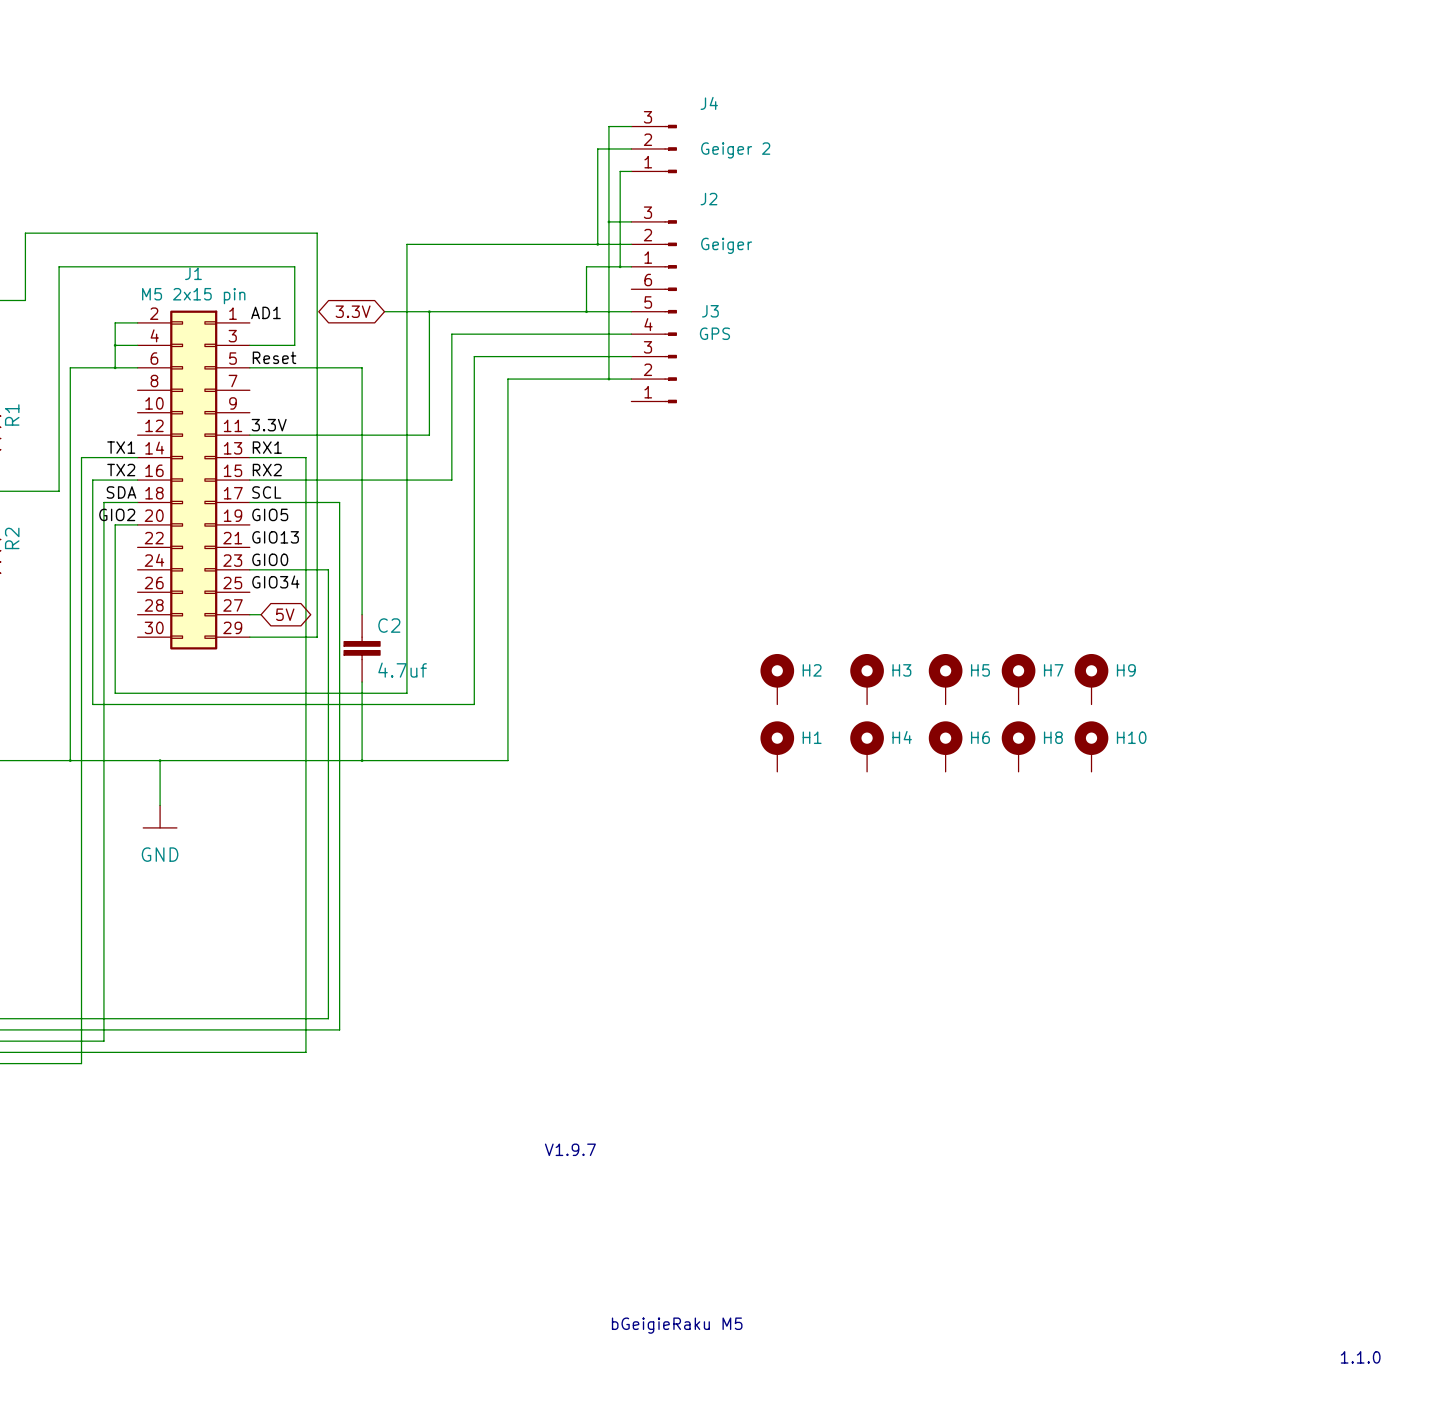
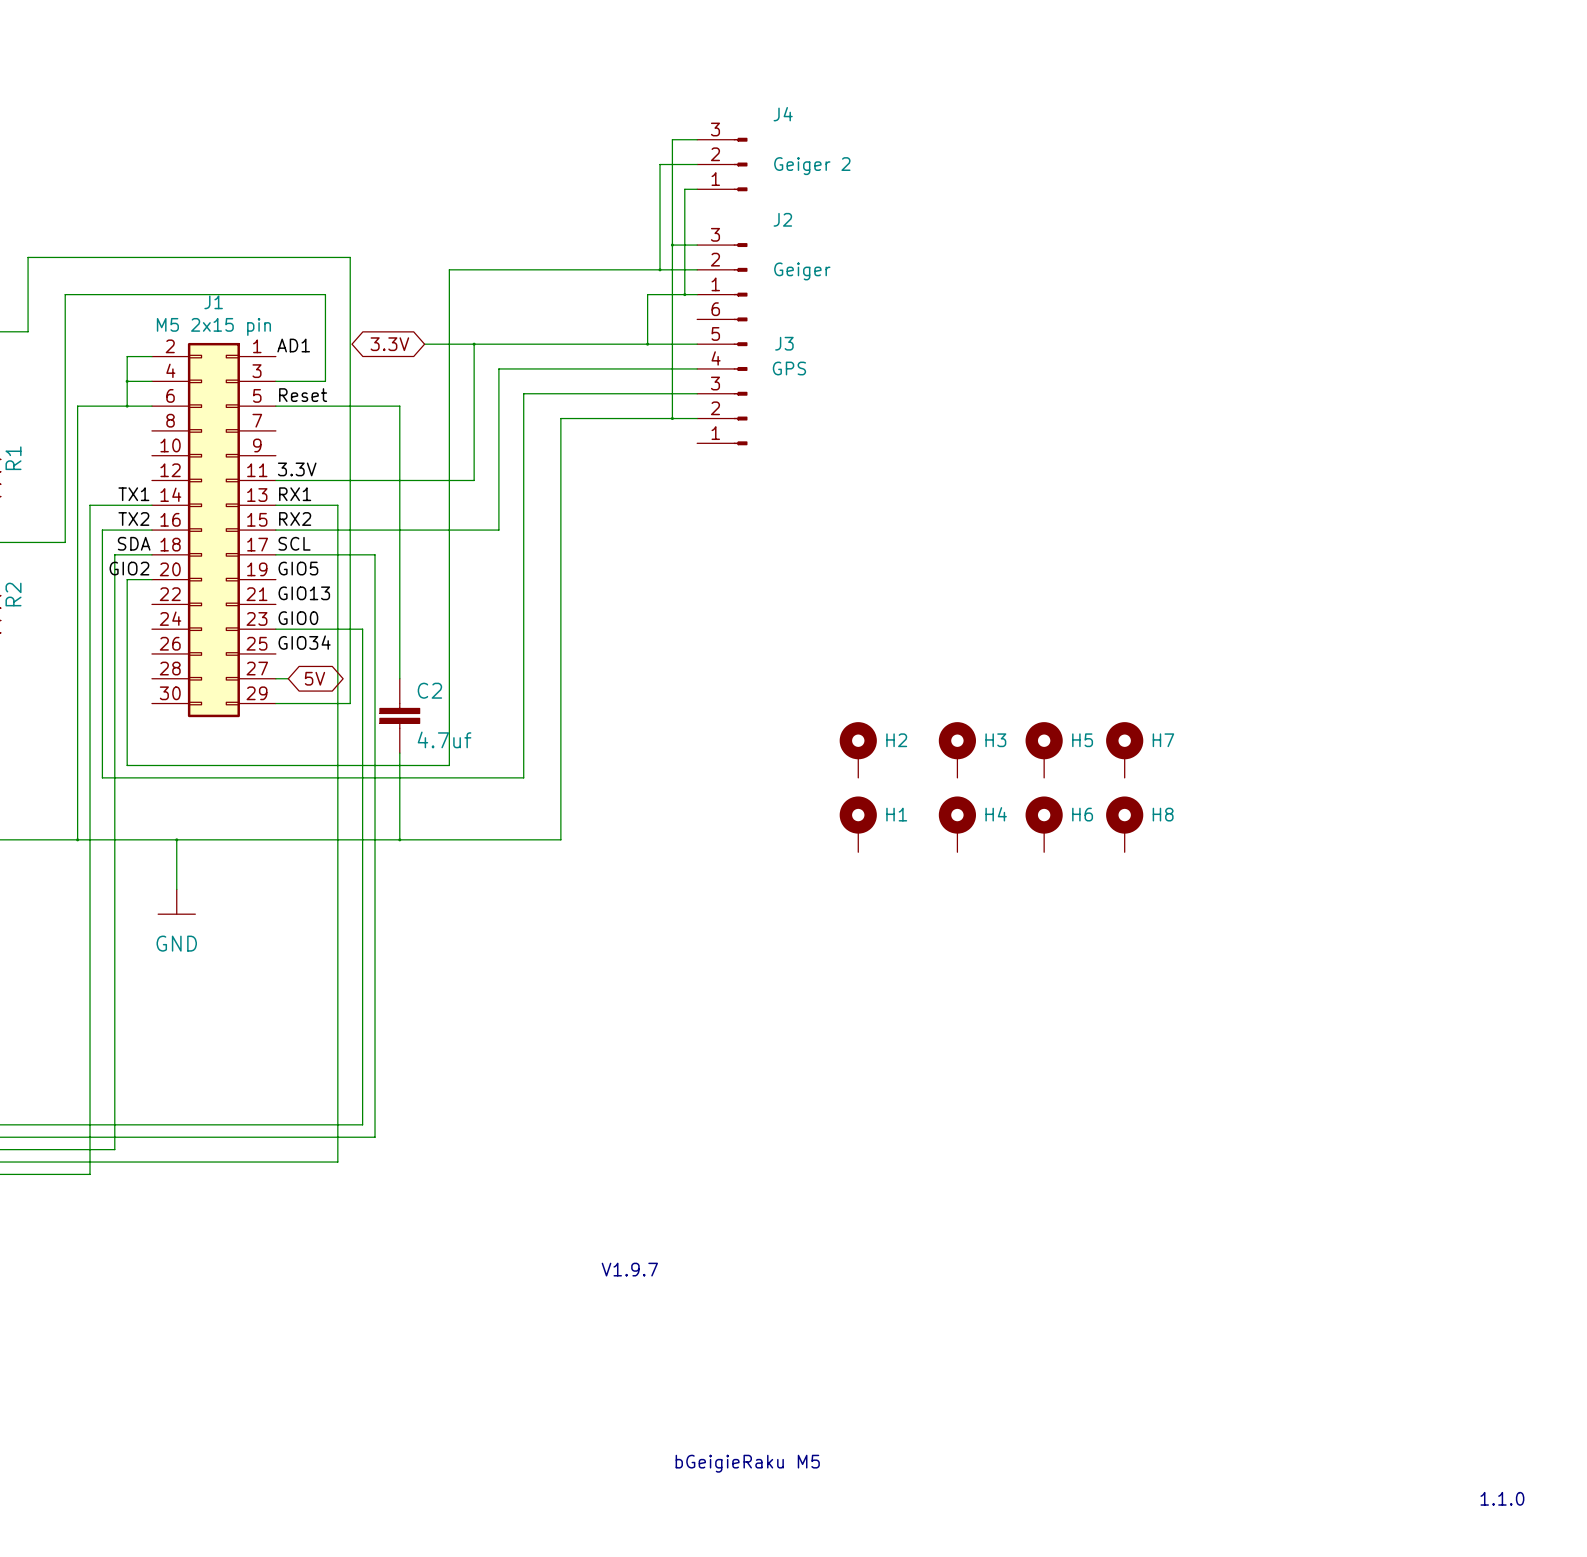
H9: (1091, 679) -> none
H10: (1091, 746) -> none

